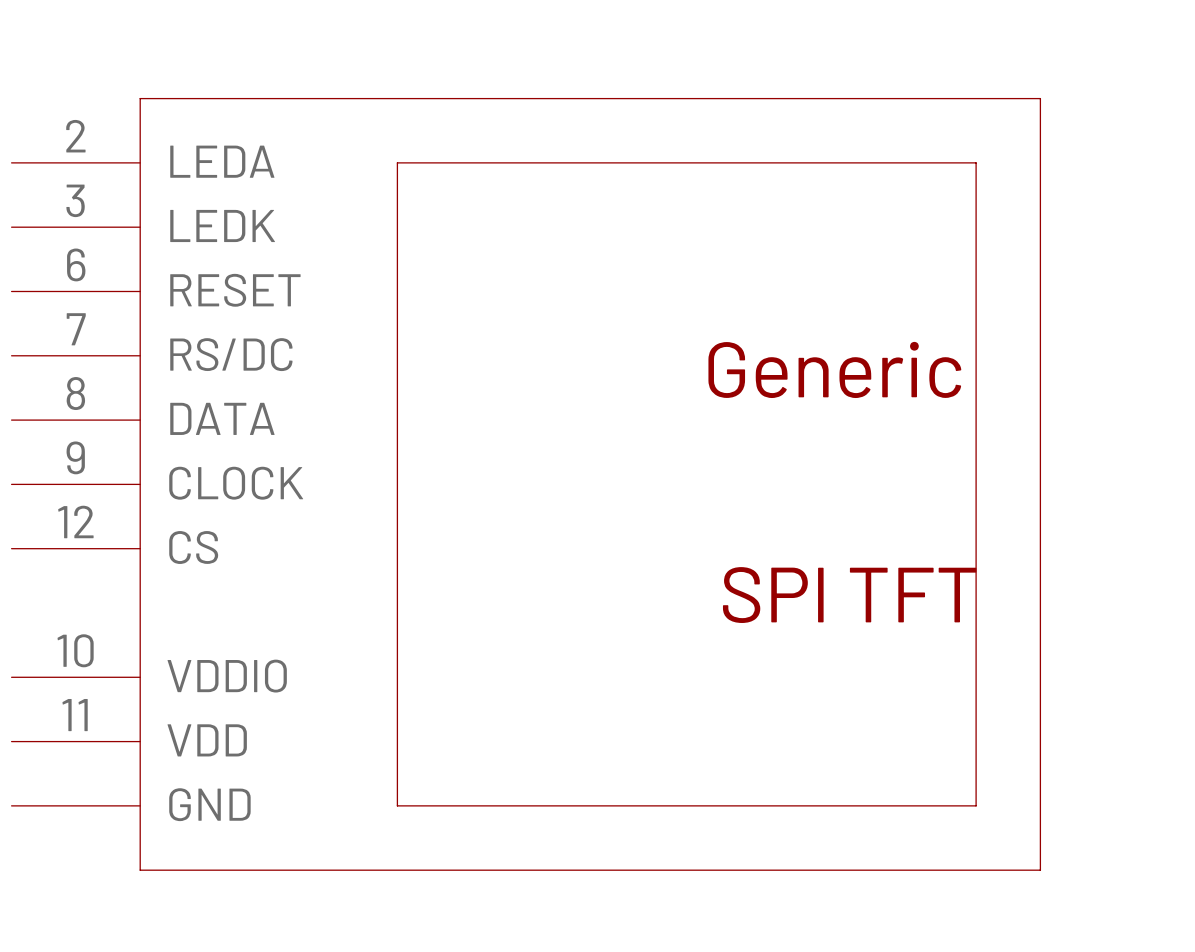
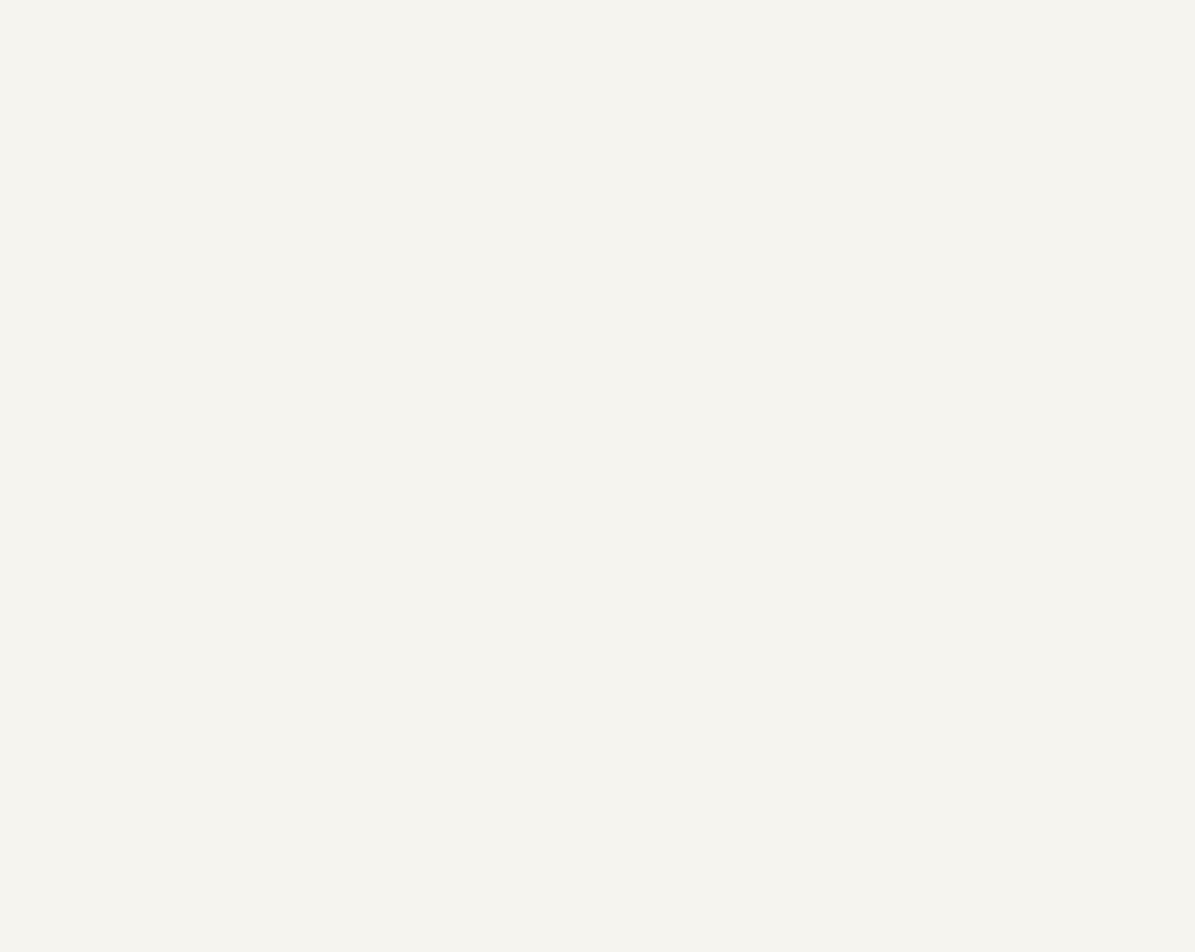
part: (525, 484) -> none

